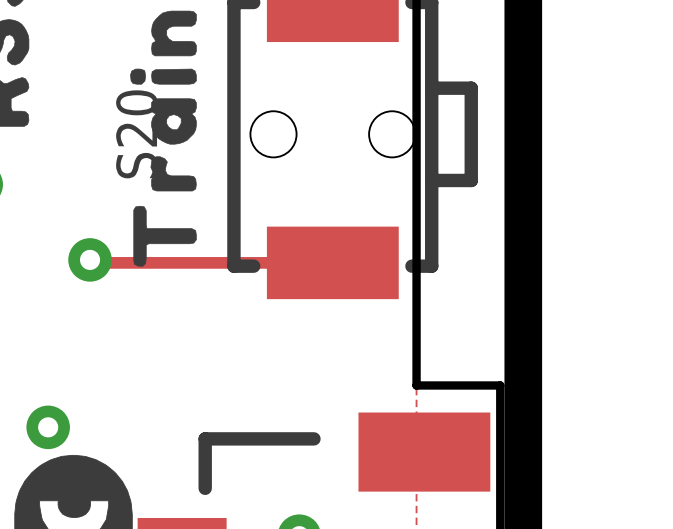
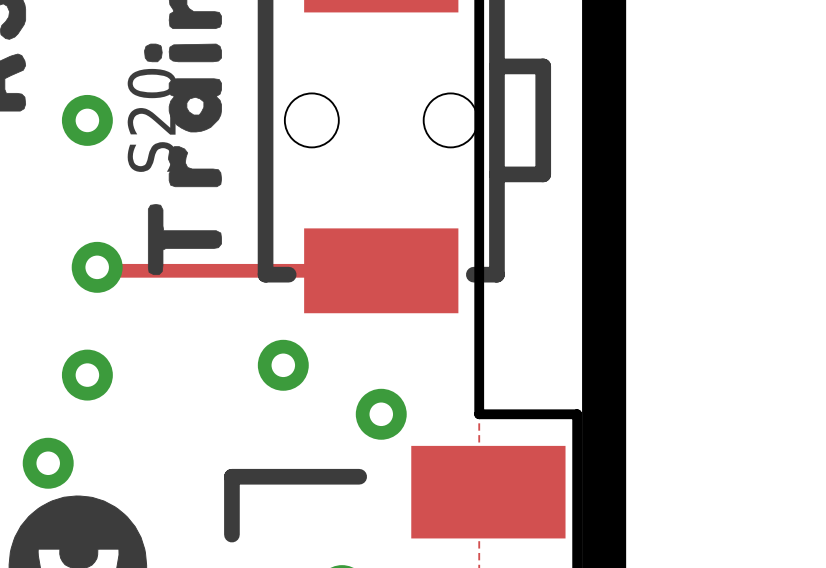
via: none -> (87, 120)
via: none -> (283, 365)
via: none -> (87, 375)
via: none -> (381, 414)

